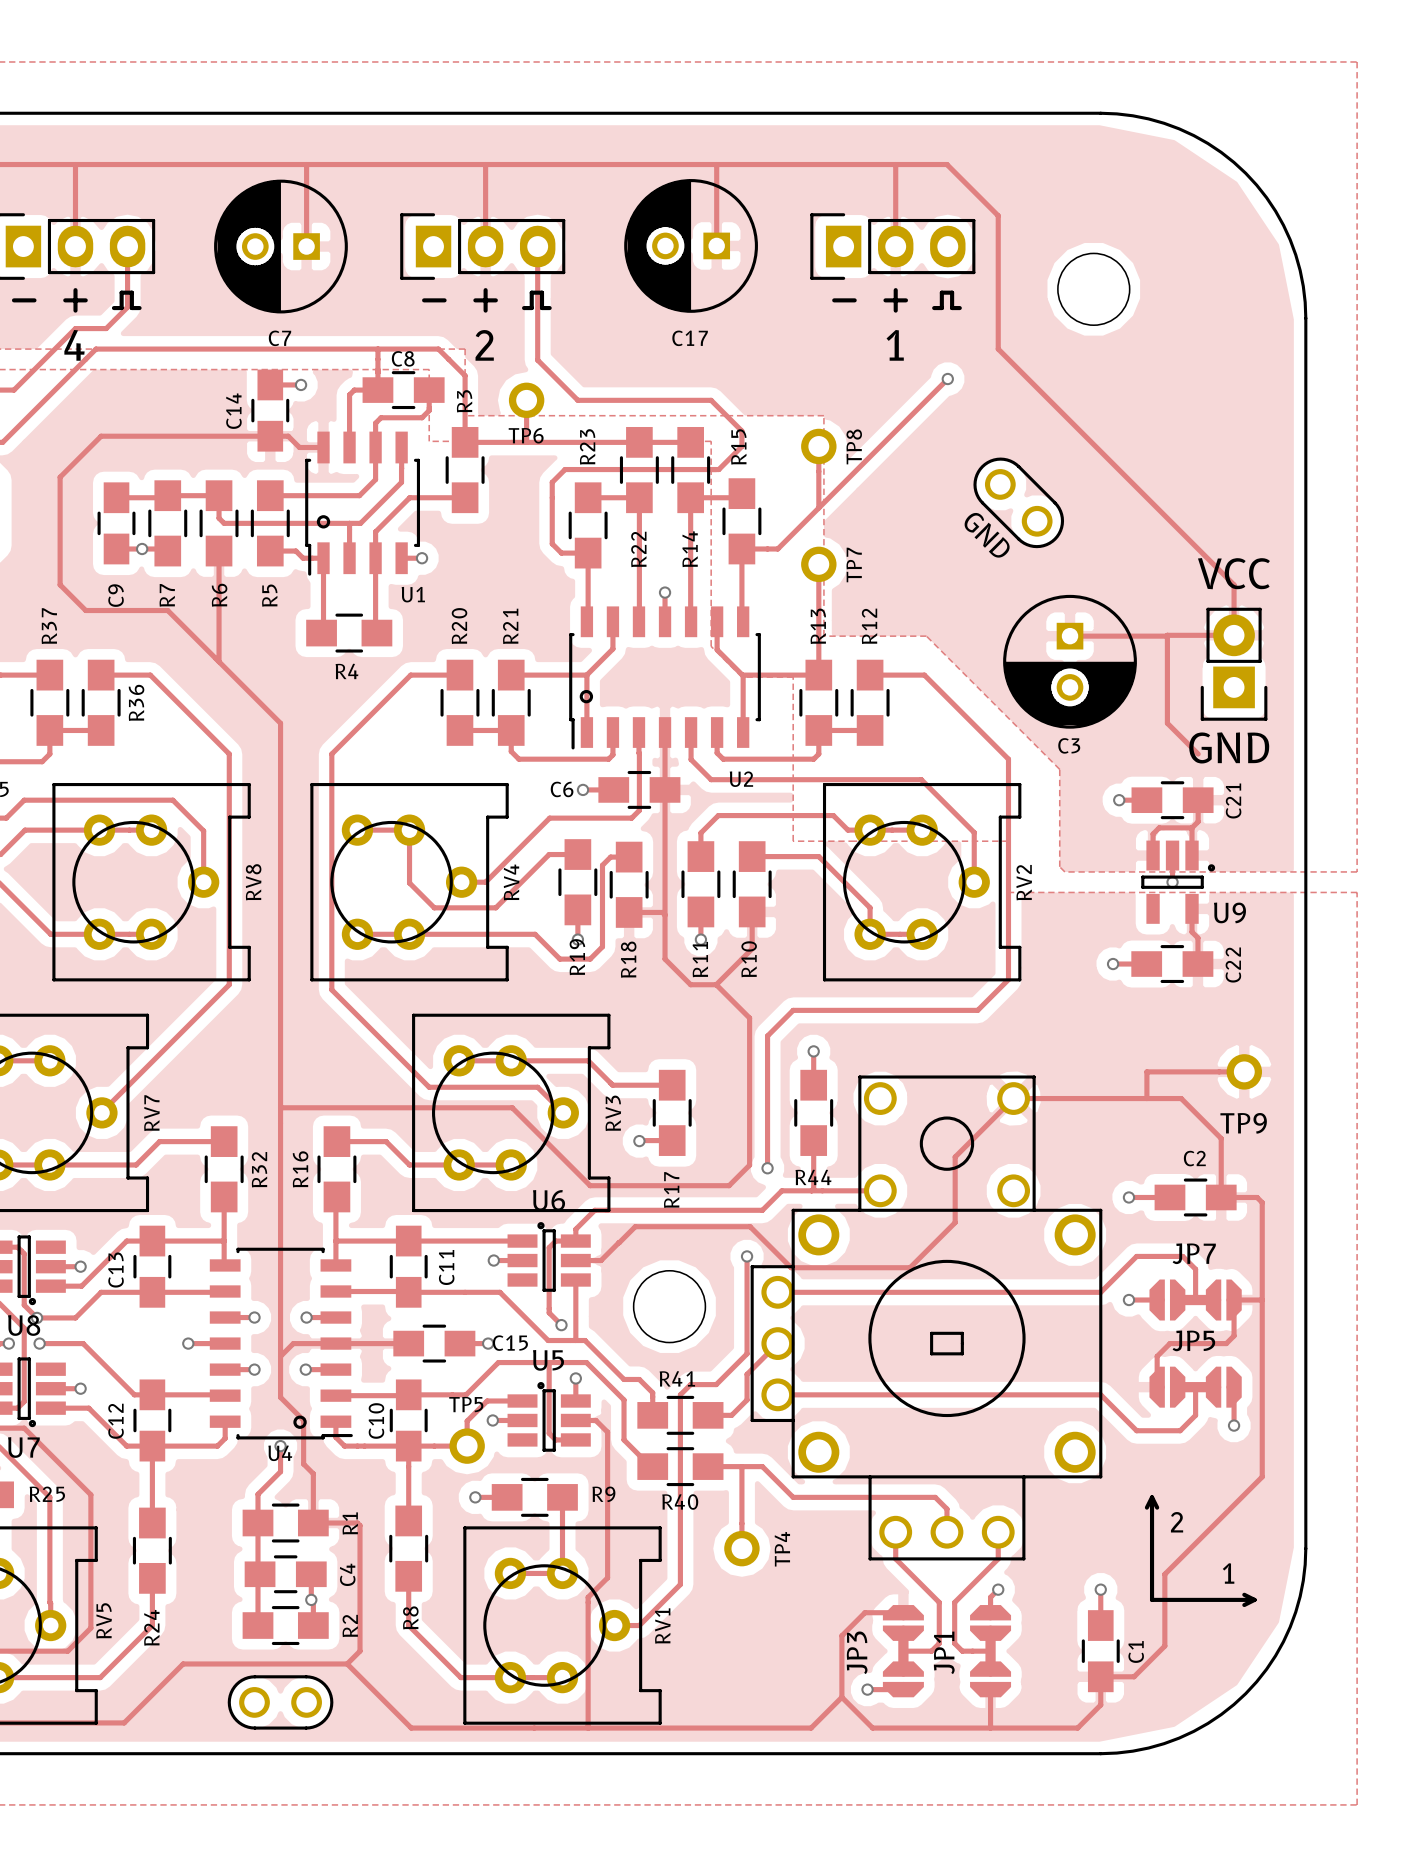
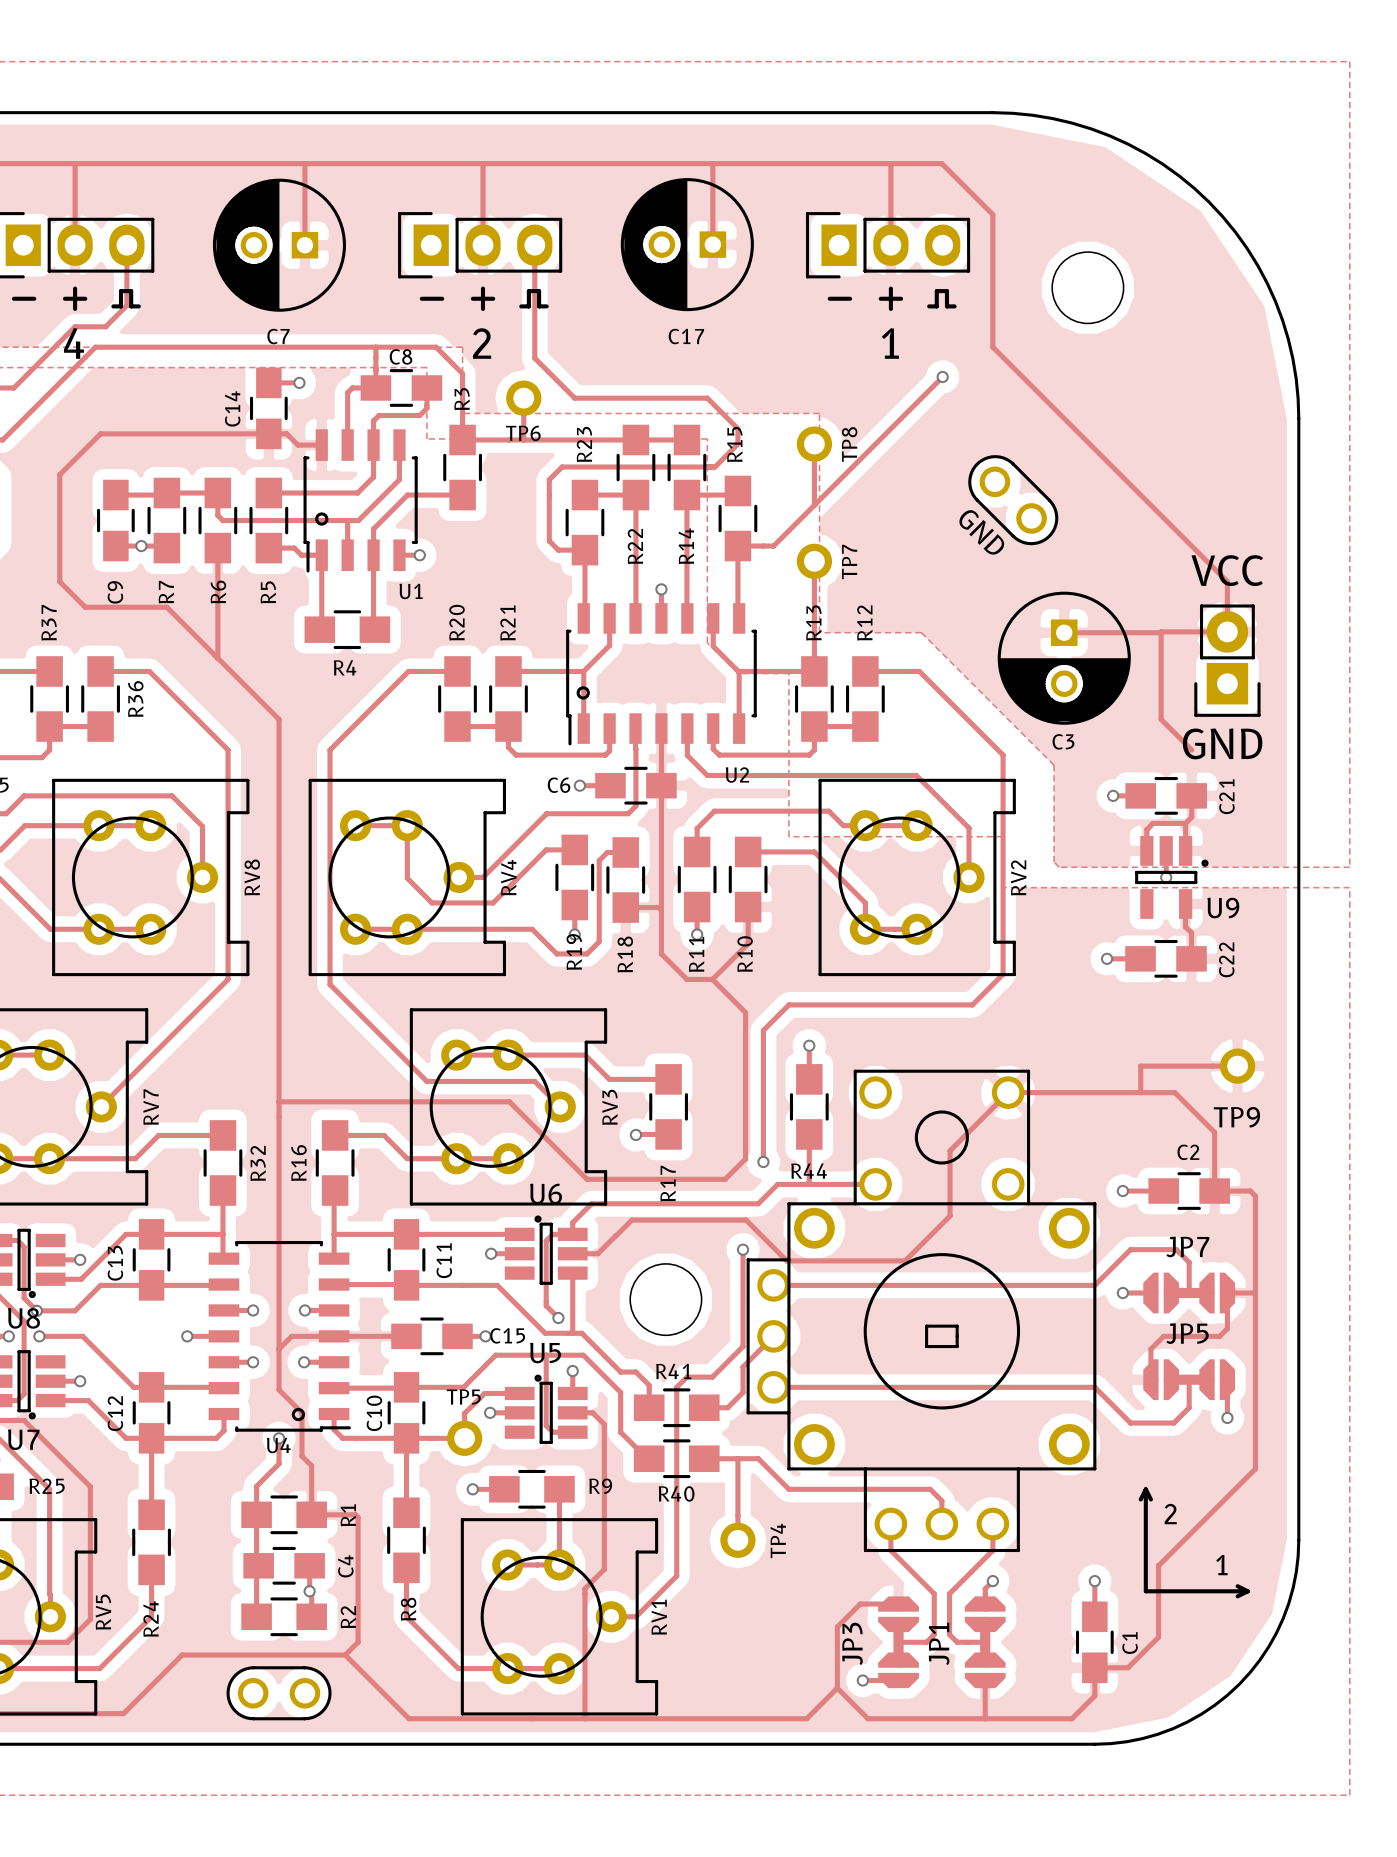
board edge: (998, 113) (1100, 113) (1148, 118) (1179, 128) (1207, 143) (1245, 173) (1275, 211) (1290, 239) (1300, 270) (1305, 318) (1305, 420) -> (992, 112) (1052, 118) (1109, 135) (1162, 164) (1209, 202) (1247, 248) (1275, 301) (1292, 358) (1298, 418)

